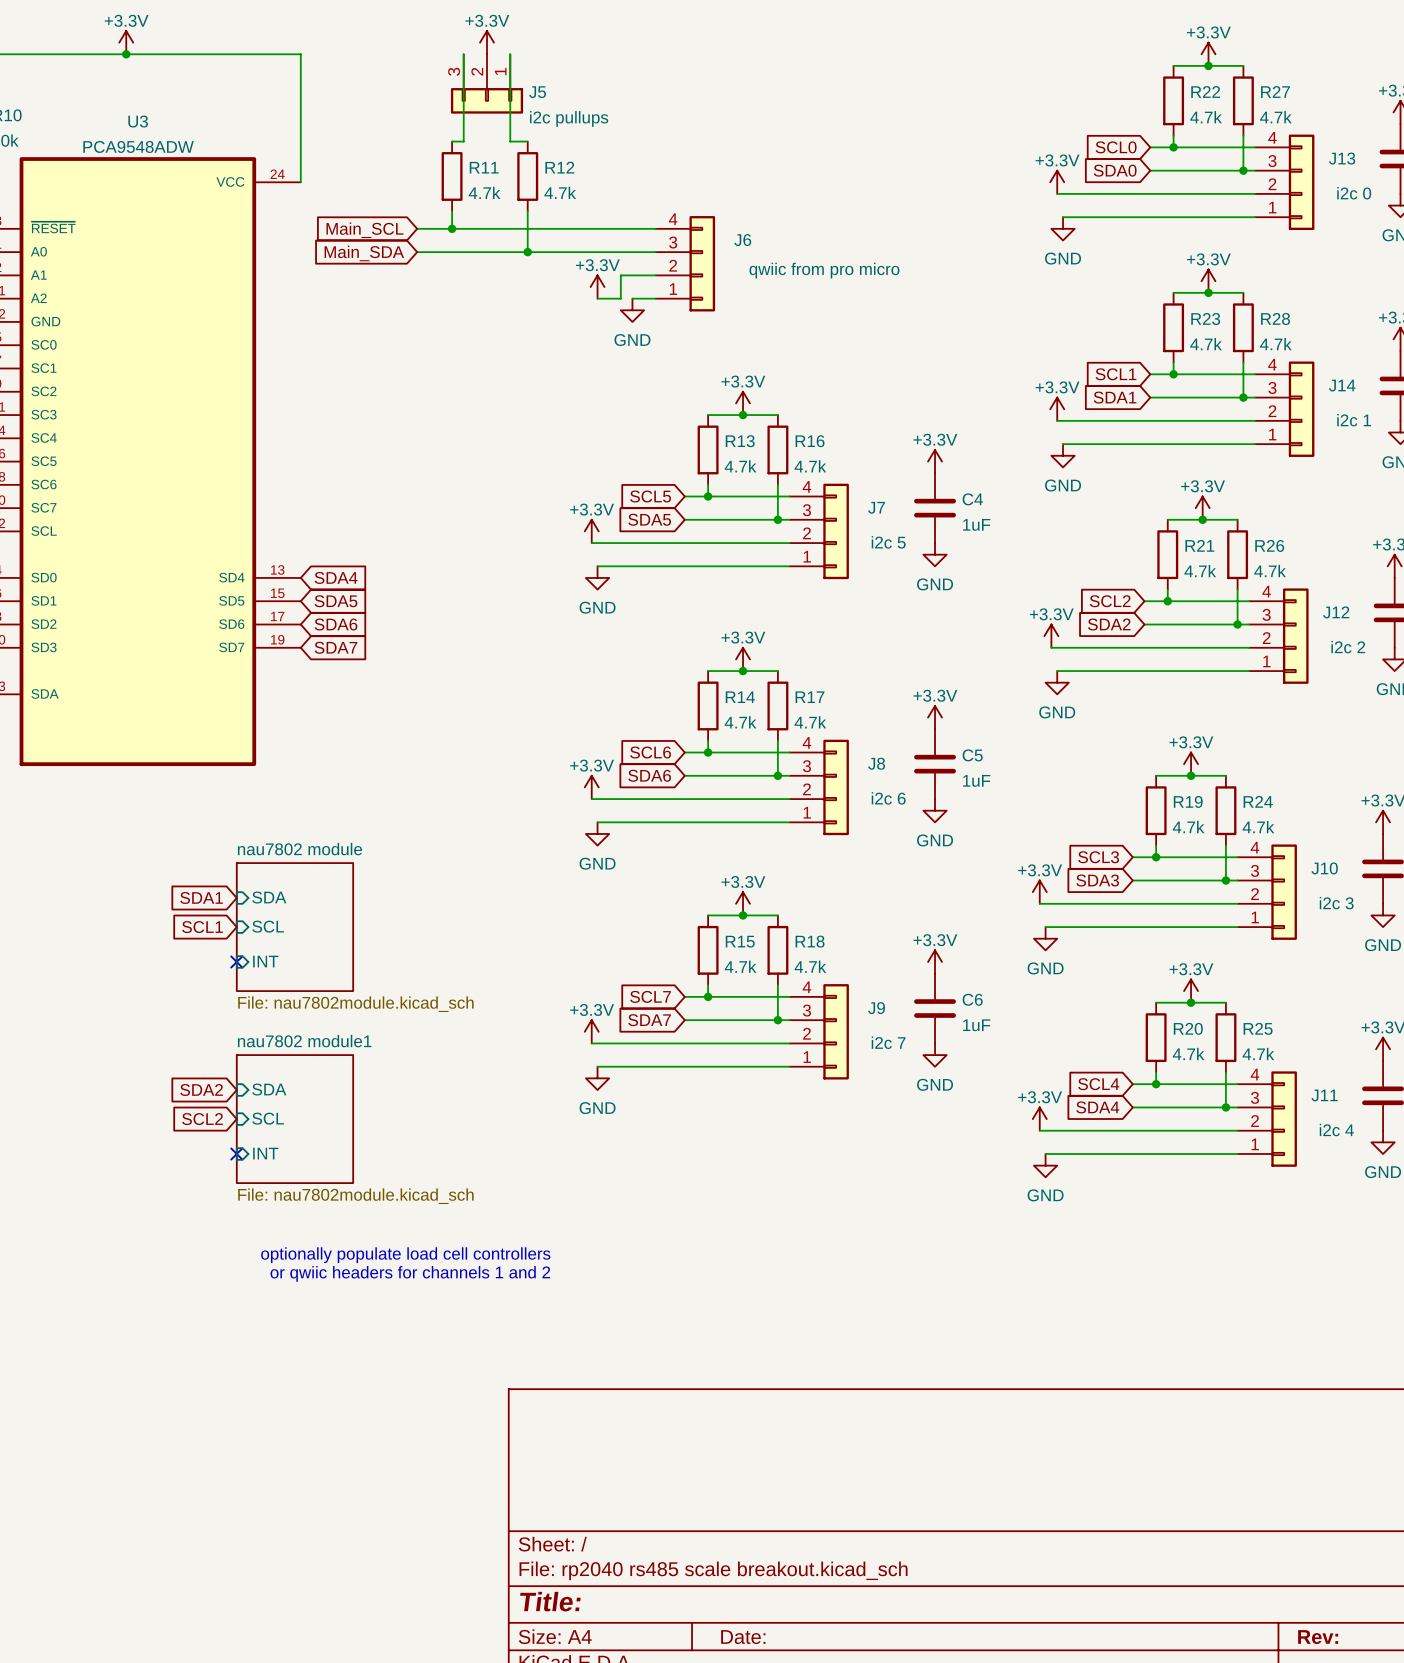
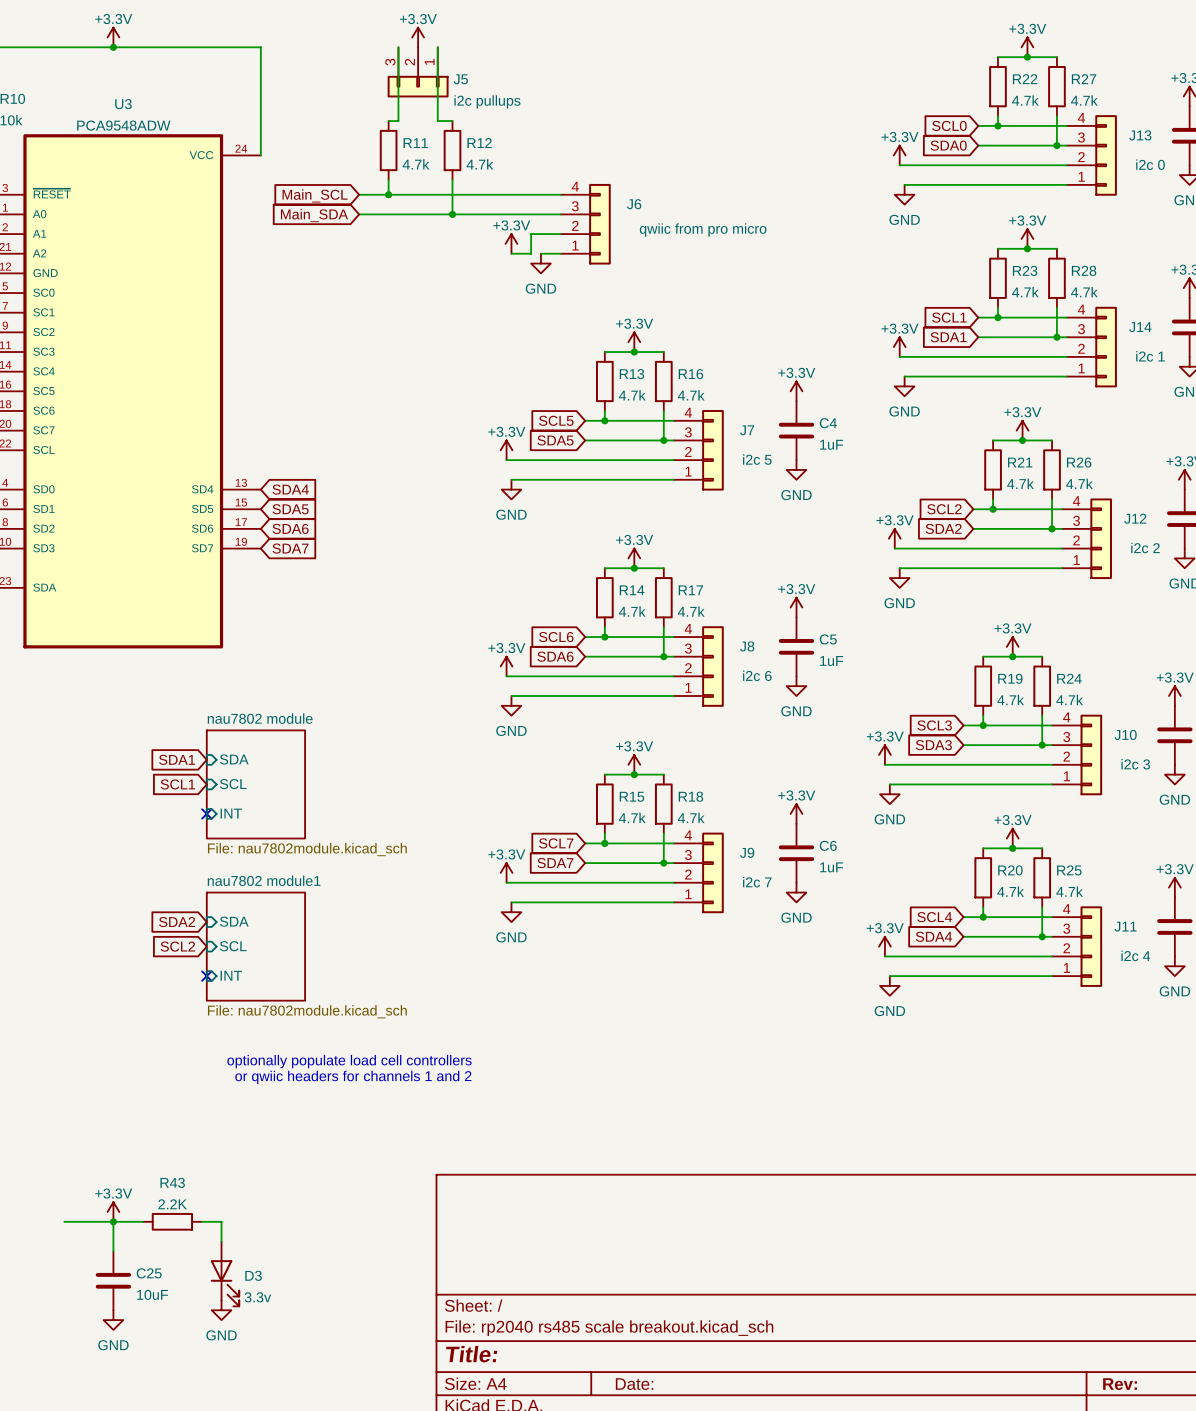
power symbol: none -> +3.3V (113, 1211)
wire: none -> (64, 1221) (142, 1221)
wire: none -> (113, 1221) (113, 1251)
junction: none -> (113, 1221)
R43: none -> 2.2K (172, 1221)
wire: none -> (201, 1221) (221, 1221) (221, 1241)
D3: none -> 3.3v (224, 1273)
C25: none -> 10uF (113, 1280)
power symbol: none -> GND (221, 1310)
power symbol: none -> GND (113, 1320)

